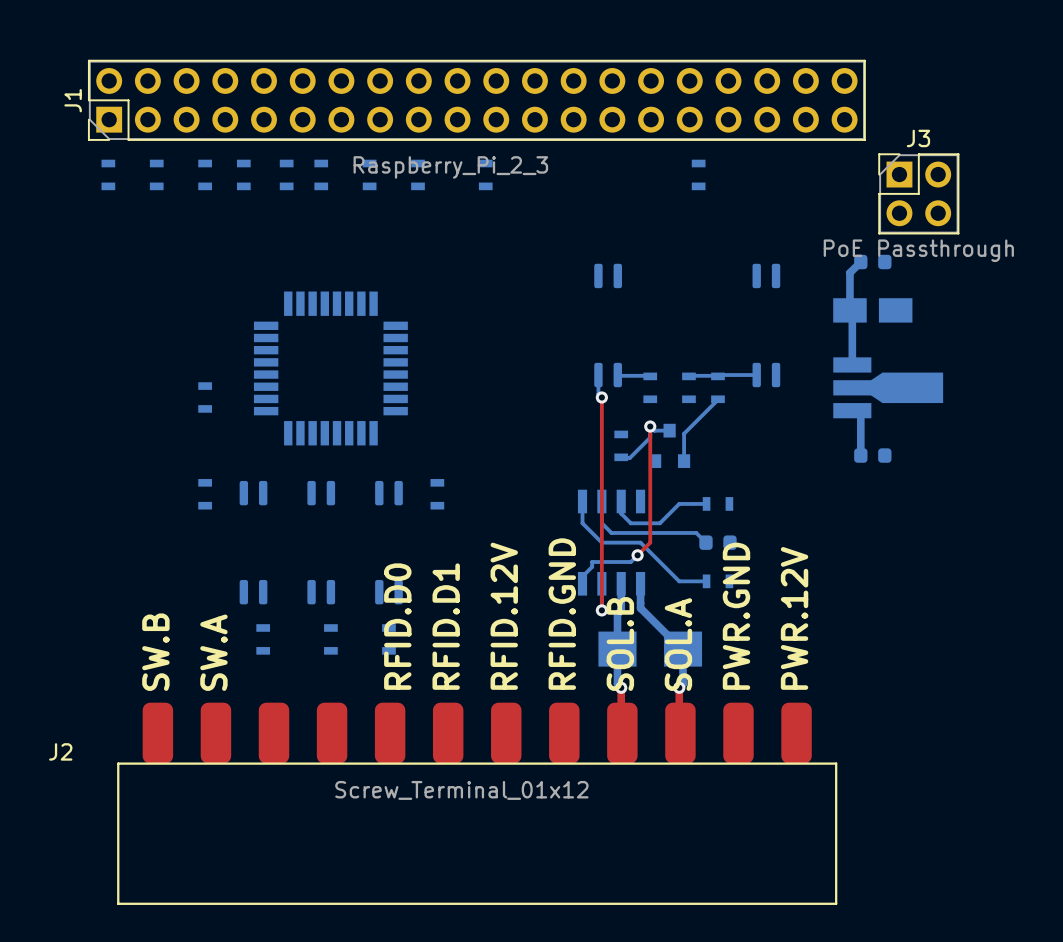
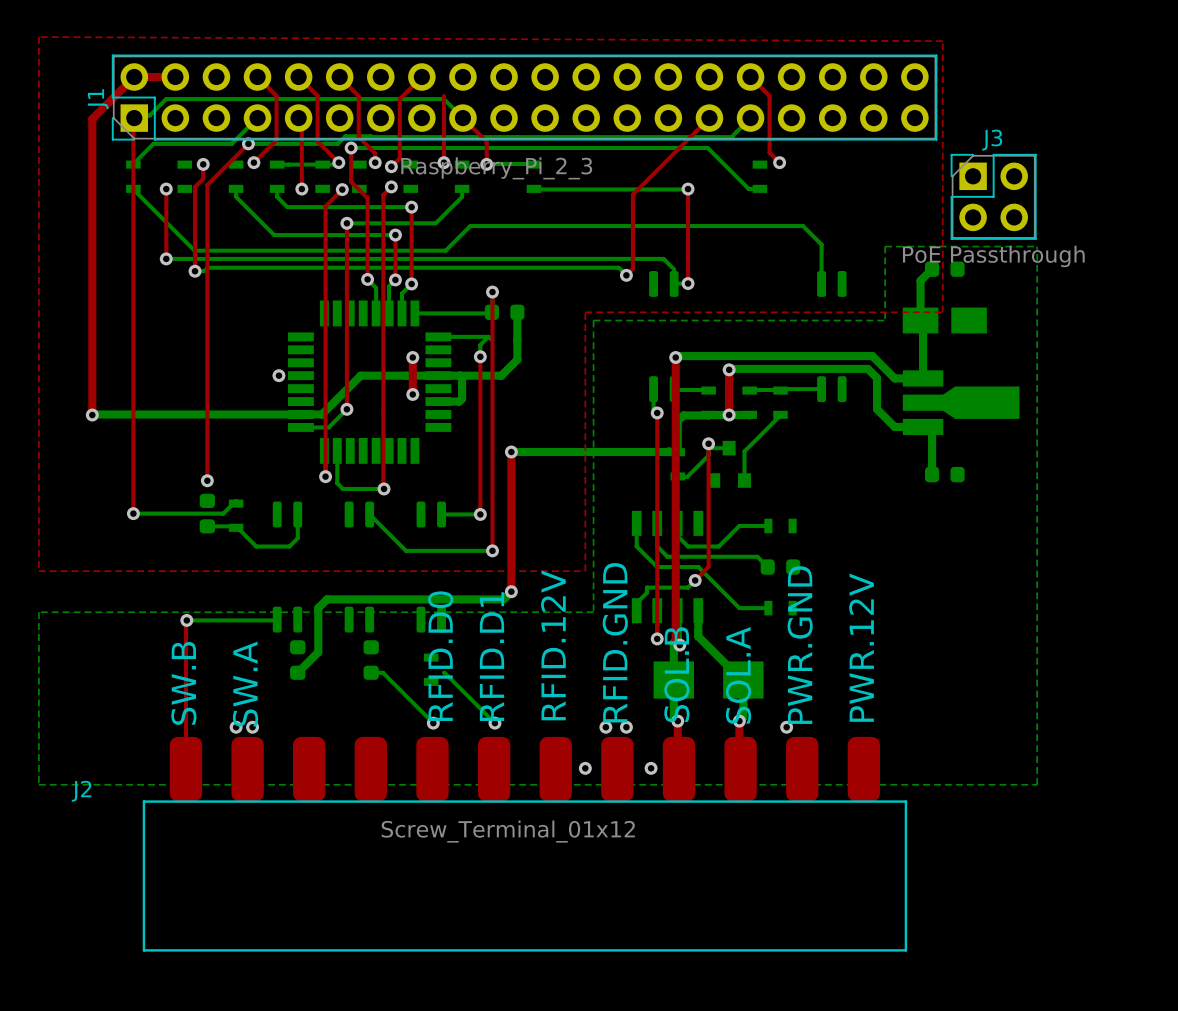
top zone outline: none -> (38, 37) (942, 41) (942, 312) (585, 312) (585, 571) (38, 571) (38, 37)
top track: none -> (175, 77) (134, 77) (92, 118) (92, 415)
top track: none -> (257, 77) (276, 96) (276, 140) (253, 162)
top track: none -> (298, 77) (317, 96) (317, 141) (338, 162)
top track: none -> (339, 77) (358, 96) (358, 137) (375, 153) (375, 162)
top track: none -> (421, 77) (399, 99) (399, 158) (391, 166)
top track: none -> (750, 77) (769, 96) (769, 152) (779, 162)
top track: none -> (443, 96) (443, 162)
bottom track: none -> (134, 118) (136, 115) (149, 115) (166, 99) (443, 99) (462, 118)
top track: none -> (134, 118) (133, 513)
bottom track: none -> (257, 118) (231, 143) (153, 143) (133, 163)
top track: none -> (298, 118) (301, 121) (301, 189)
top track: none -> (462, 118) (486, 141) (486, 164)
top track: none -> (709, 118) (632, 194) (632, 268) (626, 275)
bottom track: none -> (750, 118) (731, 137) (345, 136) (337, 143) (248, 143)
top track: none -> (248, 143) (207, 184) (207, 480)
via: none -> (248, 143)
bottom track: none -> (351, 147) (707, 147) (748, 188) (759, 188)
top track: none -> (351, 147) (351, 181) (367, 198) (367, 279)
via: none -> (351, 147)
via: none -> (253, 162)
bottom track: none -> (338, 162) (336, 164) (277, 164)
via: none -> (338, 162)
via: none -> (375, 162)
via: none -> (443, 162)
via: none -> (779, 162)
bottom track: none -> (533, 163) (486, 164)
top track: none -> (203, 164) (203, 178) (195, 186) (195, 271)
via: none -> (203, 164)
via: none -> (486, 164)
via: none -> (391, 166)
top track: none -> (391, 186) (383, 195) (384, 488)
via: none -> (391, 186)
bottom track: none -> (133, 189) (194, 250) (445, 250) (470, 226) (803, 226) (821, 244) (821, 283)
top track: none -> (166, 189) (166, 258)
via: none -> (166, 189)
bottom track: none -> (236, 188) (236, 196) (274, 235) (395, 235)
bottom track: none -> (277, 188) (277, 196) (287, 207) (411, 207)
via: none -> (301, 189)
bottom track: none -> (462, 188) (462, 196) (435, 223) (346, 223)
bottom track: none -> (688, 189) (533, 189)
top track: none -> (688, 189) (688, 283)
via: none -> (688, 189)
top track: none -> (342, 189) (325, 206) (325, 476)
via: none -> (342, 189)
top track: none -> (411, 207) (411, 283)
via: none -> (411, 207)
top track: none -> (346, 223) (346, 409)
via: none -> (346, 223)
top track: none -> (395, 235) (395, 279)
via: none -> (395, 235)
bottom zone outline: none -> (885, 246) (1037, 246) (1037, 784) (38, 784) (38, 612) (593, 612) (593, 320) (885, 320) (885, 246)
bottom track: none -> (166, 258) (663, 258) (674, 269) (674, 283) (688, 283)
via: none -> (166, 258)
bottom track: none -> (195, 271) (204, 271) (207, 267) (618, 267) (626, 275)
via: none -> (195, 271)
via: none -> (626, 275)
bottom track: none -> (367, 279) (376, 287) (376, 313)
via: none -> (367, 279)
bottom track: none -> (395, 279) (389, 286) (389, 313)
via: none -> (395, 279)
bottom track: none -> (411, 283) (401, 293) (401, 313)
via: none -> (411, 283)
via: none -> (688, 283)
bottom track: none -> (492, 292) (491, 313) (414, 313)
top track: none -> (492, 292) (492, 550)
via: none -> (492, 292)
part: none -> (504, 312)
bottom track: none -> (517, 312) (517, 359) (501, 375) (360, 375) (321, 414) (92, 415)
bottom track: none -> (438, 336) (488, 336) (492, 340)
bottom track: none -> (488, 336) (480, 344) (480, 356)
top track: none -> (480, 356) (480, 514)
via: none -> (480, 356)
top track: none -> (412, 357) (412, 394)
via: none -> (412, 357)
bottom track: none -> (675, 357) (872, 356) (894, 378) (923, 378)
top track: none -> (675, 357) (675, 640) (679, 645)
via: none -> (675, 357)
bottom track: none -> (729, 369) (867, 368) (877, 378) (877, 409) (894, 426) (923, 426)
top track: none -> (729, 369) (729, 415)
via: none -> (729, 369)
via: none -> (278, 375)
bottom track: none -> (459, 375) (462, 378) (462, 398) (459, 401) (438, 401)
via: none -> (412, 394)
bottom track: none -> (346, 409) (328, 427) (300, 427)
via: none -> (346, 409)
part: (205, 397) -> none
via: none -> (92, 415)
via: none -> (729, 415)
bottom track: none -> (749, 415) (683, 415) (677, 421) (677, 451) (511, 451)
bottom track: none -> (337, 450) (337, 483) (342, 488) (384, 488)
top track: none -> (511, 451) (511, 591)
via: none -> (511, 451)
via: none -> (325, 476)
via: none -> (207, 480)
via: none -> (384, 488)
bottom track: none -> (236, 500) (223, 513) (133, 513)
via: none -> (133, 513)
part: none -> (207, 513)
bottom track: none -> (297, 514) (297, 538) (289, 546) (256, 546) (236, 526) (207, 526)
bottom track: none -> (369, 514) (406, 550) (492, 550)
bottom track: none -> (441, 514) (480, 514)
via: none -> (480, 514)
part: (437, 494) -> none
via: none -> (492, 550)
bottom track: none -> (511, 591) (503, 599) (327, 599) (318, 608) (318, 652) (297, 672)
via: none -> (511, 591)
top track: none -> (186, 620) (185, 769)
via: none -> (186, 620)
bottom track: none -> (277, 619) (186, 620)
via: none -> (679, 645)
part footprint: [256, 624, 271, 655] -> [290, 640, 306, 680]
part footprint: [324, 624, 338, 655] -> [363, 640, 379, 680]
bottom track: none -> (371, 672) (382, 672) (433, 723)
bottom track: none -> (443, 672) (494, 723)
via: none -> (433, 723)
via: none -> (494, 723)
via: none -> (236, 727)
via: none -> (252, 727)
via: none -> (605, 727)
via: none -> (626, 727)
via: none -> (786, 727)
via: none -> (585, 768)
via: none -> (651, 768)

